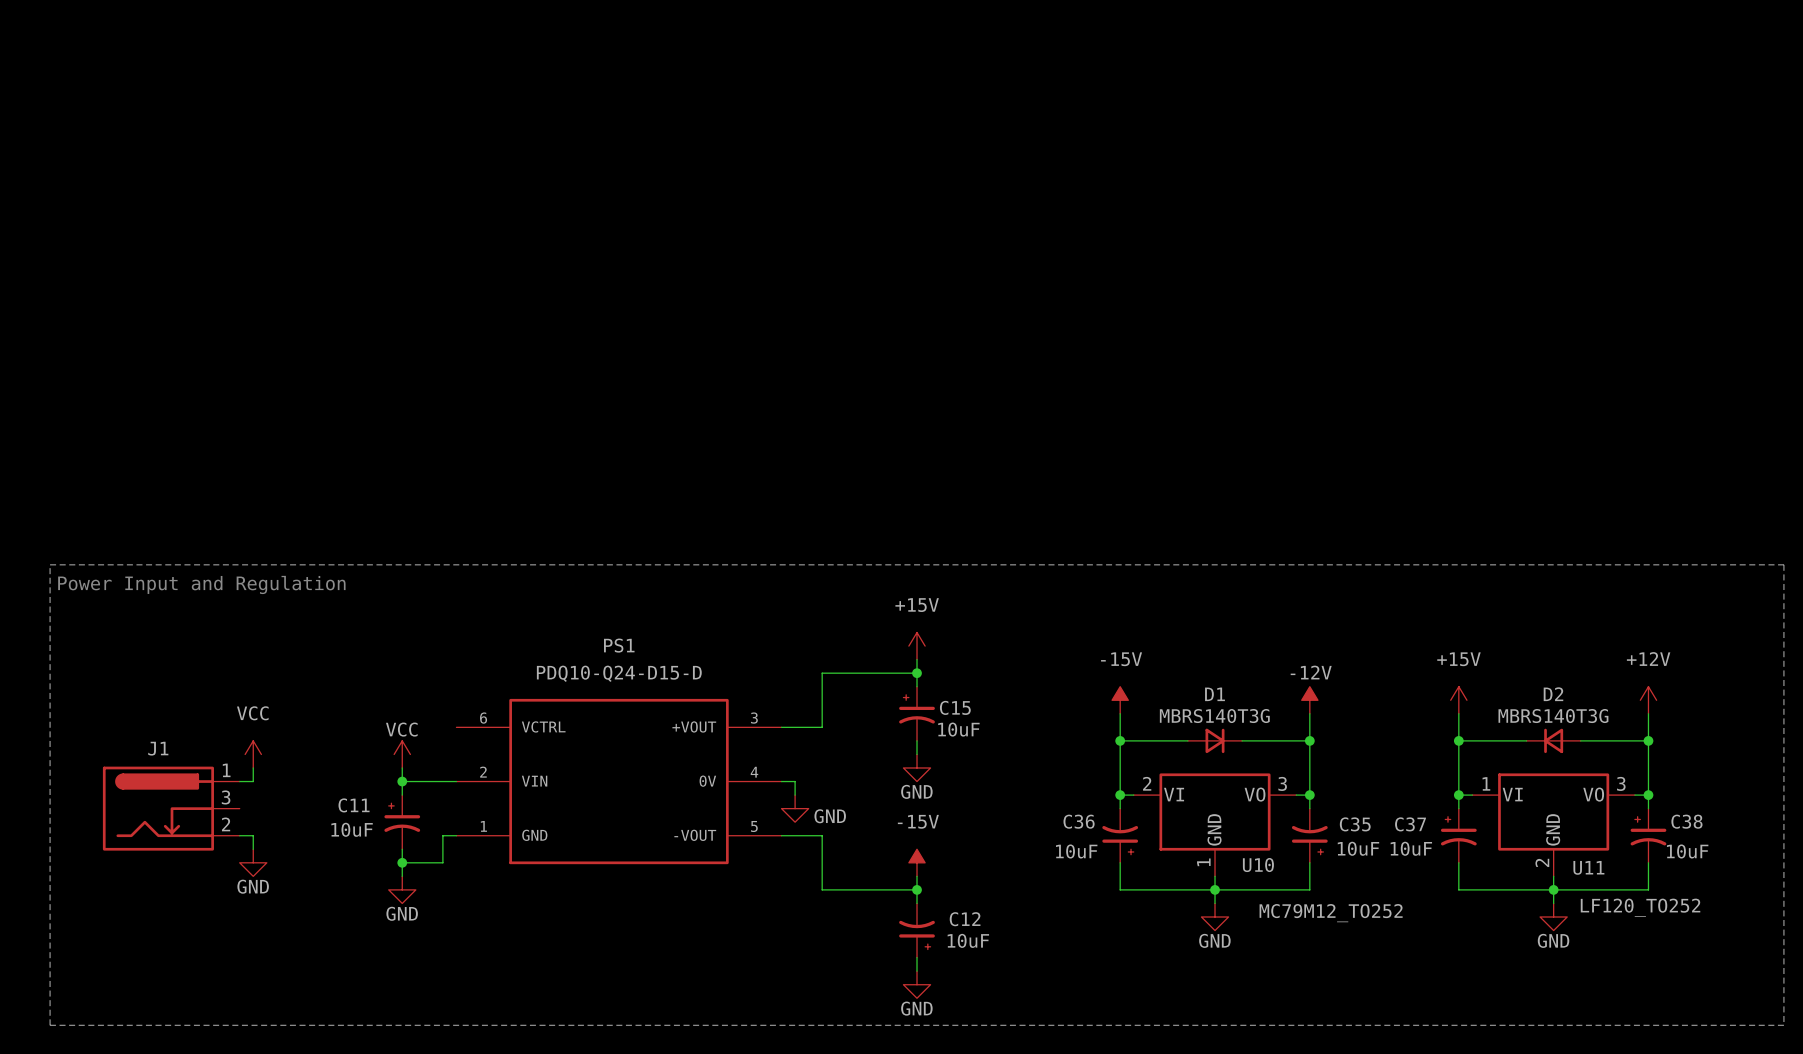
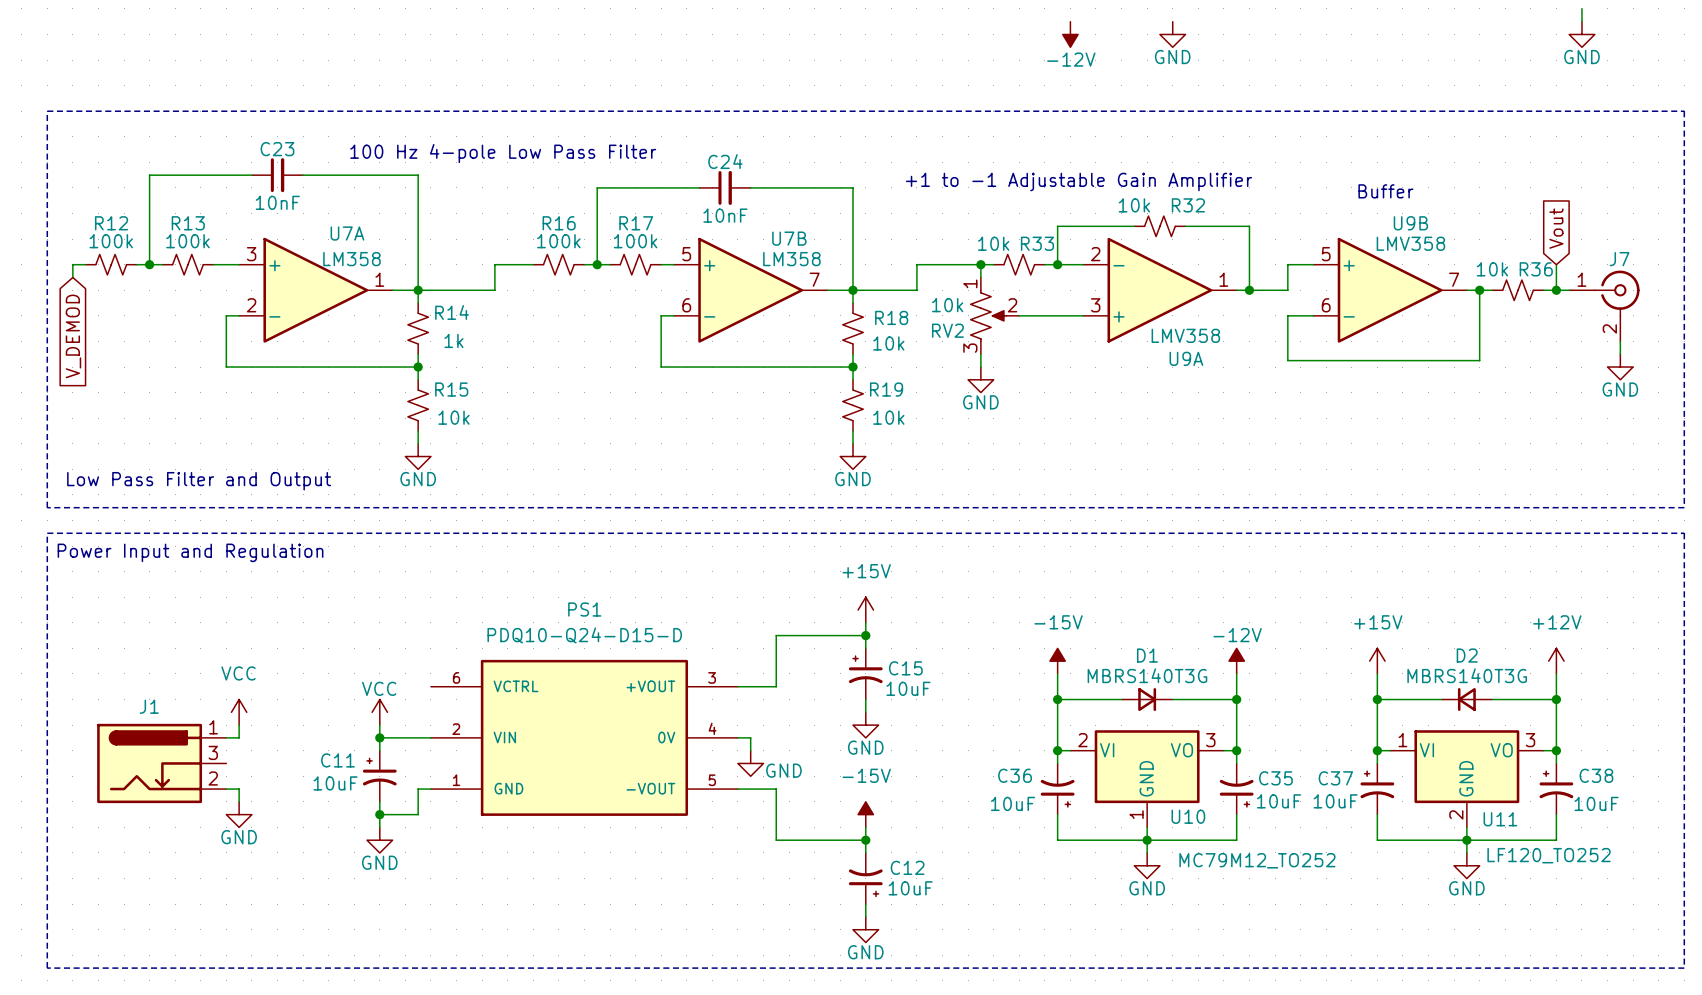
wire: none -> (1581, 8) (1581, 21)
power symbol: none -> -12V (1070, 34)
power symbol: none -> GND (1172, 34)
power symbol: none -> GND (1581, 34)
line: none -> (47, 111) (47, 507) (1684, 507) (1684, 111) (47, 111)
text: none -> 100 Hz 4-pole Low Pass Filter (503, 153)
wire: none -> (251, 175) (149, 175) (149, 264)
C23: none -> 10nF (277, 175)
wire: none -> (303, 175) (418, 175) (418, 303)
text: none -> +1 to -1 Adjustable Gain Amplifier (1079, 181)
wire: none -> (699, 187) (597, 187) (597, 264)
C24: none -> 10nF (725, 187)
wire: none -> (750, 187) (853, 187) (853, 303)
text: none -> Buffer (1385, 191)
wire: none -> (1134, 226) (1057, 226) (1057, 264)
R32: none -> 10k (1159, 226)
wire: none -> (1185, 226) (1249, 226) (1249, 290)
global label: none -> Vout (1556, 228)
wire: none -> (85, 264) (72, 264) (72, 277)
R12: none -> 100k (111, 264)
wire: none -> (136, 264) (162, 264)
junction: none -> (149, 264)
R13: none -> 100k (187, 264)
wire: none -> (213, 264) (239, 264)
wire: none -> (533, 264) (494, 264) (494, 290) (392, 290)
R16: none -> 100k (558, 264)
wire: none -> (584, 264) (610, 264)
junction: none -> (597, 264)
R17: none -> 100k (635, 264)
wire: none -> (661, 264) (673, 264)
wire: none -> (980, 264) (980, 277)
junction: none -> (980, 264)
wire: none -> (993, 264) (916, 264) (916, 290) (827, 290)
R33: none -> 10k (1019, 264)
wire: none -> (1044, 264) (1083, 264)
junction: none -> (1057, 264)
wire: none -> (1313, 264) (1287, 264) (1287, 290) (1236, 290)
wire: none -> (1556, 264) (1556, 290)
U7A: none -> LM358 (315, 290)
junction: none -> (418, 290)
U7B: none -> LM358 (750, 290)
junction: none -> (853, 290)
U9A: none -> LMV358 (1159, 290)
junction: none -> (1249, 290)
U9B: none -> LMV358 (1390, 290)
wire: none -> (1466, 290) (1492, 290)
wire: none -> (1479, 290) (1479, 360) (1287, 360) (1287, 315) (1313, 315)
junction: none -> (1479, 290)
R36: none -> 10k (1518, 290)
wire: none -> (1543, 290) (1569, 290)
junction: none -> (1556, 290)
J7: none -> (1604, 306)
wire: none -> (239, 315) (226, 315) (226, 367) (418, 367)
wire: none -> (673, 315) (661, 315) (661, 367) (853, 367)
RV2: none -> 10k (994, 315)
wire: none -> (1019, 315) (1083, 315)
global label: none -> V_DEMOD (73, 336)
R14: none -> 1k (418, 328)
R18: none -> 10k (853, 328)
wire: none -> (1620, 341) (1620, 354)
wire: none -> (418, 354) (418, 379)
wire: none -> (853, 354) (853, 379)
wire: none -> (980, 354) (980, 367)
junction: none -> (418, 367)
junction: none -> (853, 367)
power symbol: none -> GND (1620, 367)
power symbol: none -> GND (980, 379)
R15: none -> 10k (418, 405)
R19: none -> 10k (853, 405)
wire: none -> (418, 430) (418, 443)
wire: none -> (853, 430) (853, 443)
power symbol: none -> GND (418, 456)
power symbol: none -> GND (853, 456)
text: none -> Low Pass Filter and Output (199, 481)

